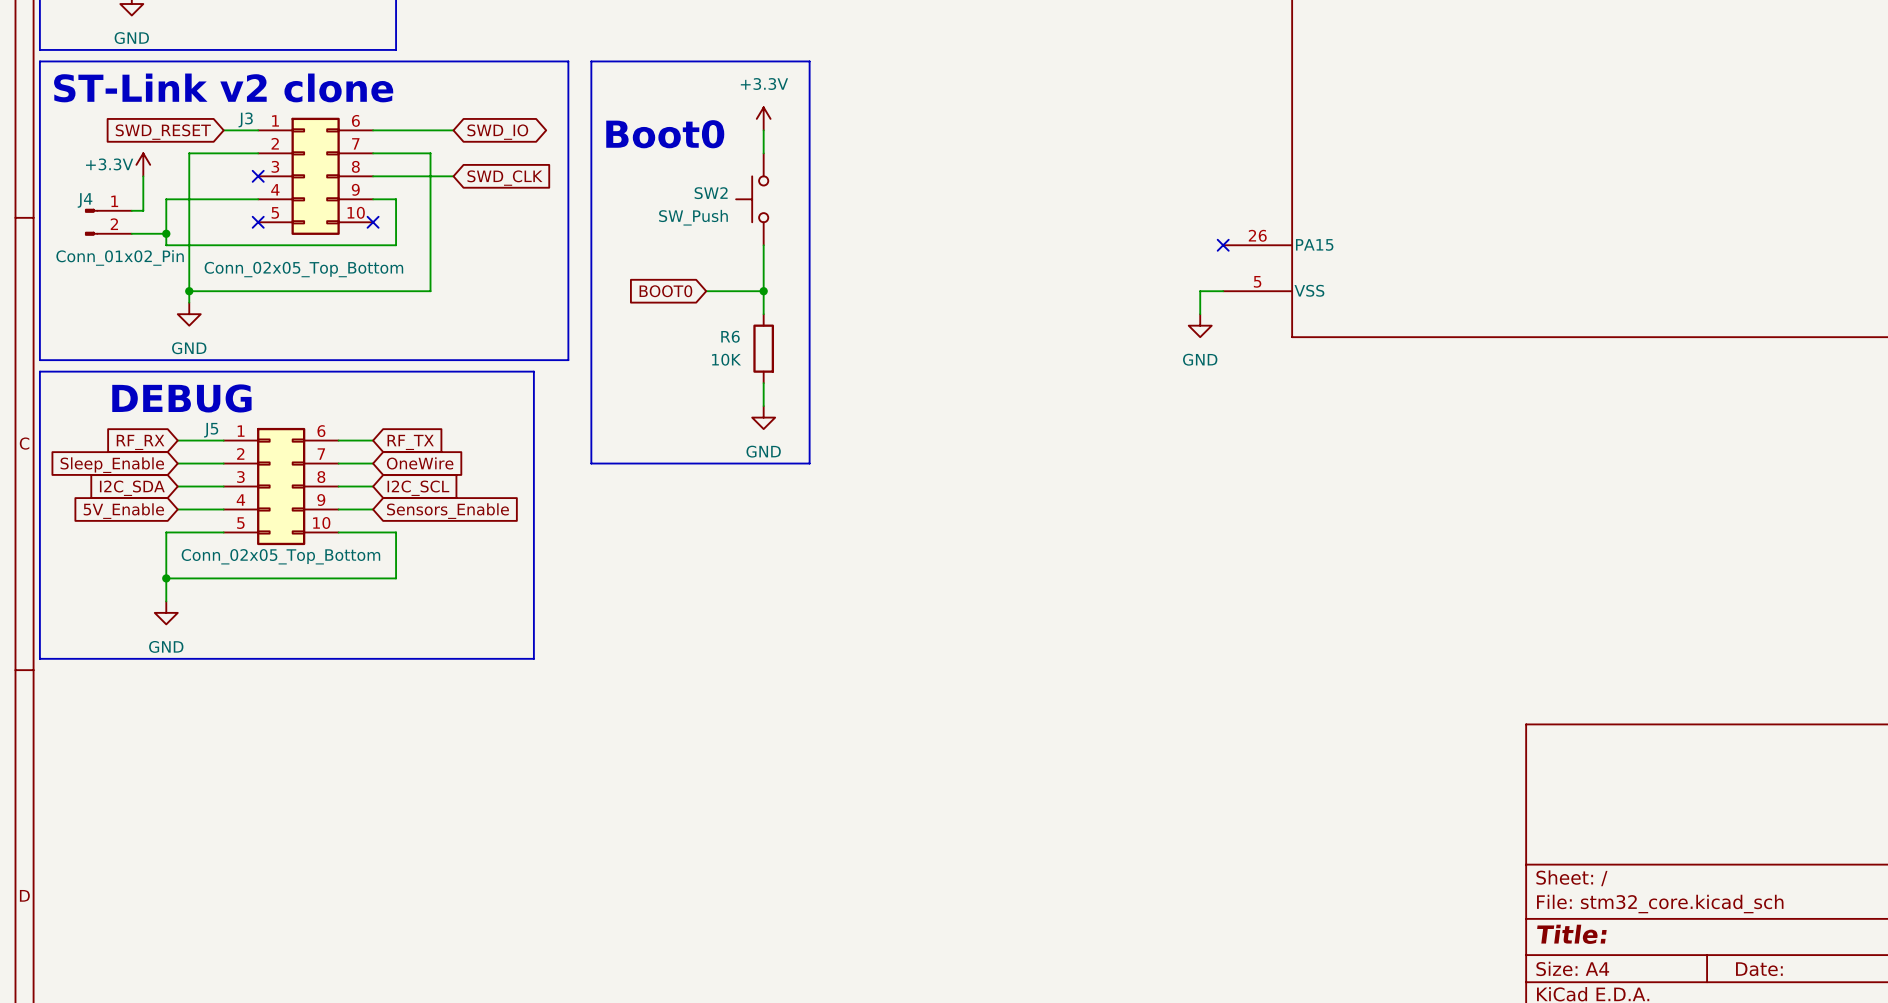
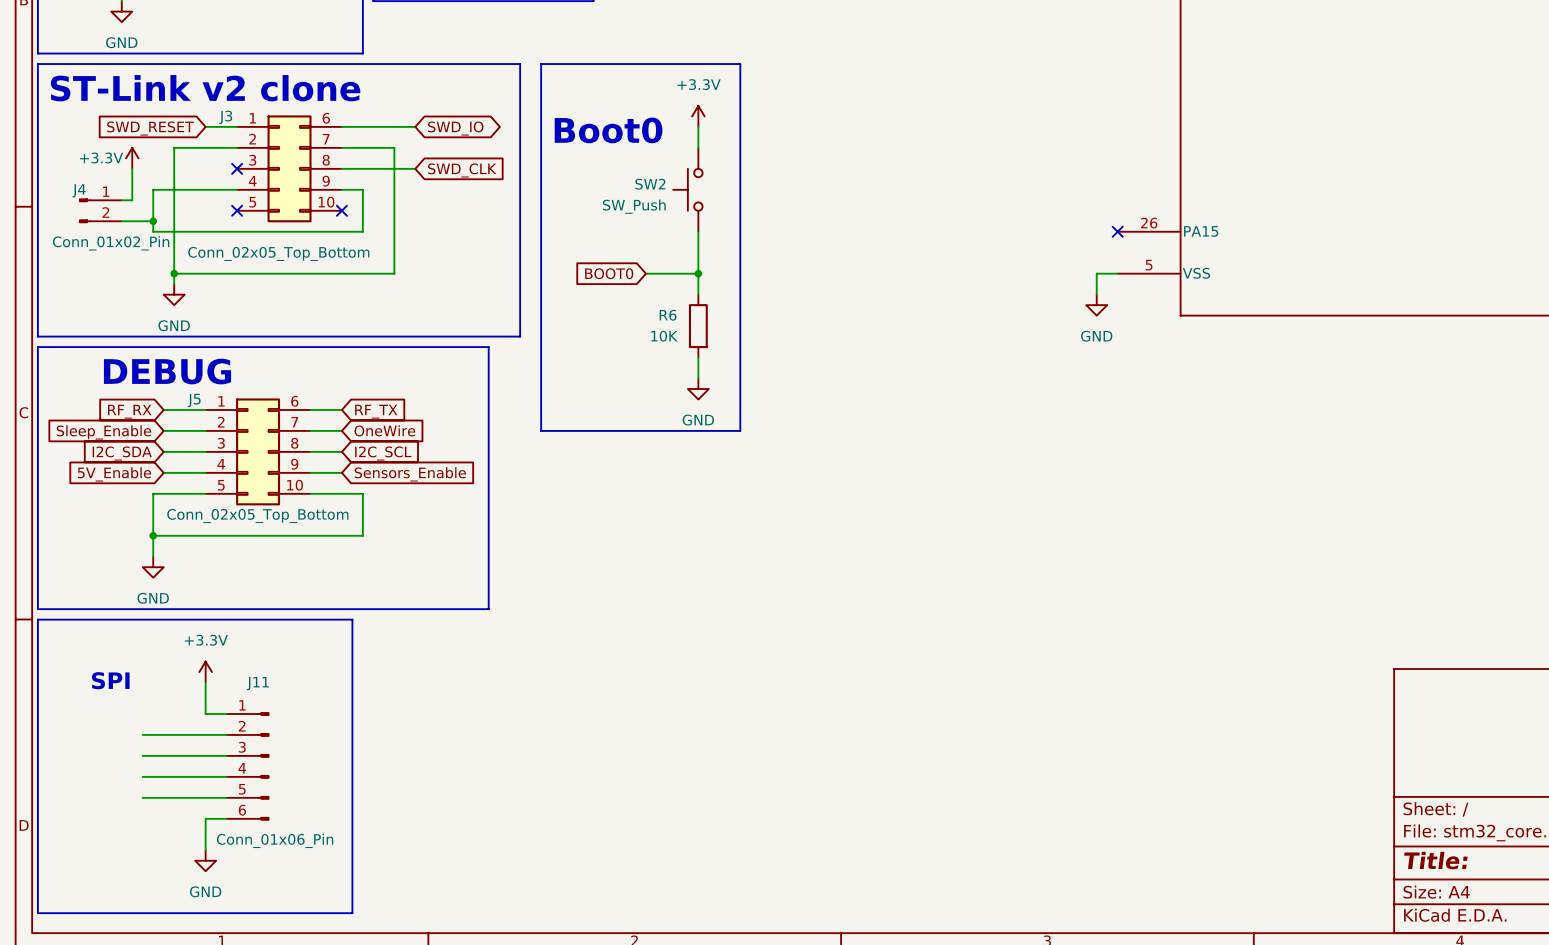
line: none -> (37, 619) (352, 619) (352, 913) (37, 913) (37, 619)
power symbol: none -> +3.3V (205, 672)
text: none -> SPI (110, 680)
wire: none -> (205, 682) (205, 713) (226, 713)
wire: none -> (142, 734) (226, 734)
wire: none -> (142, 755) (226, 755)
J11: none -> Conn_01x06_Pin (247, 766)
wire: none -> (142, 776) (226, 776)
wire: none -> (142, 797) (226, 797)
wire: none -> (226, 818) (205, 818) (205, 850)
power symbol: none -> GND (205, 860)

